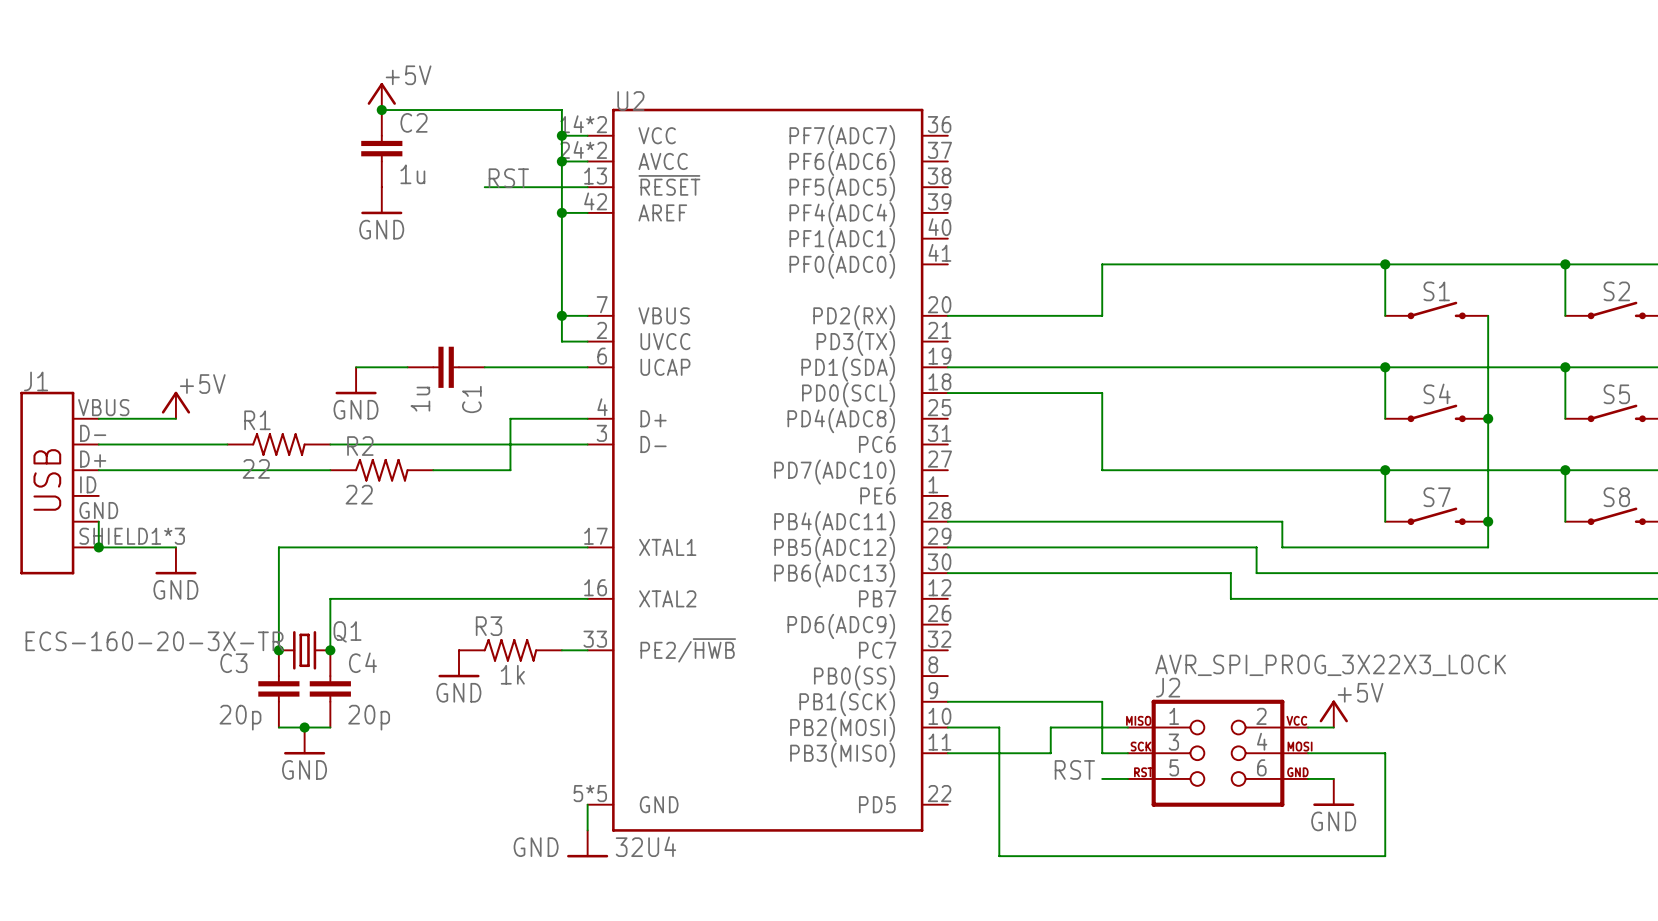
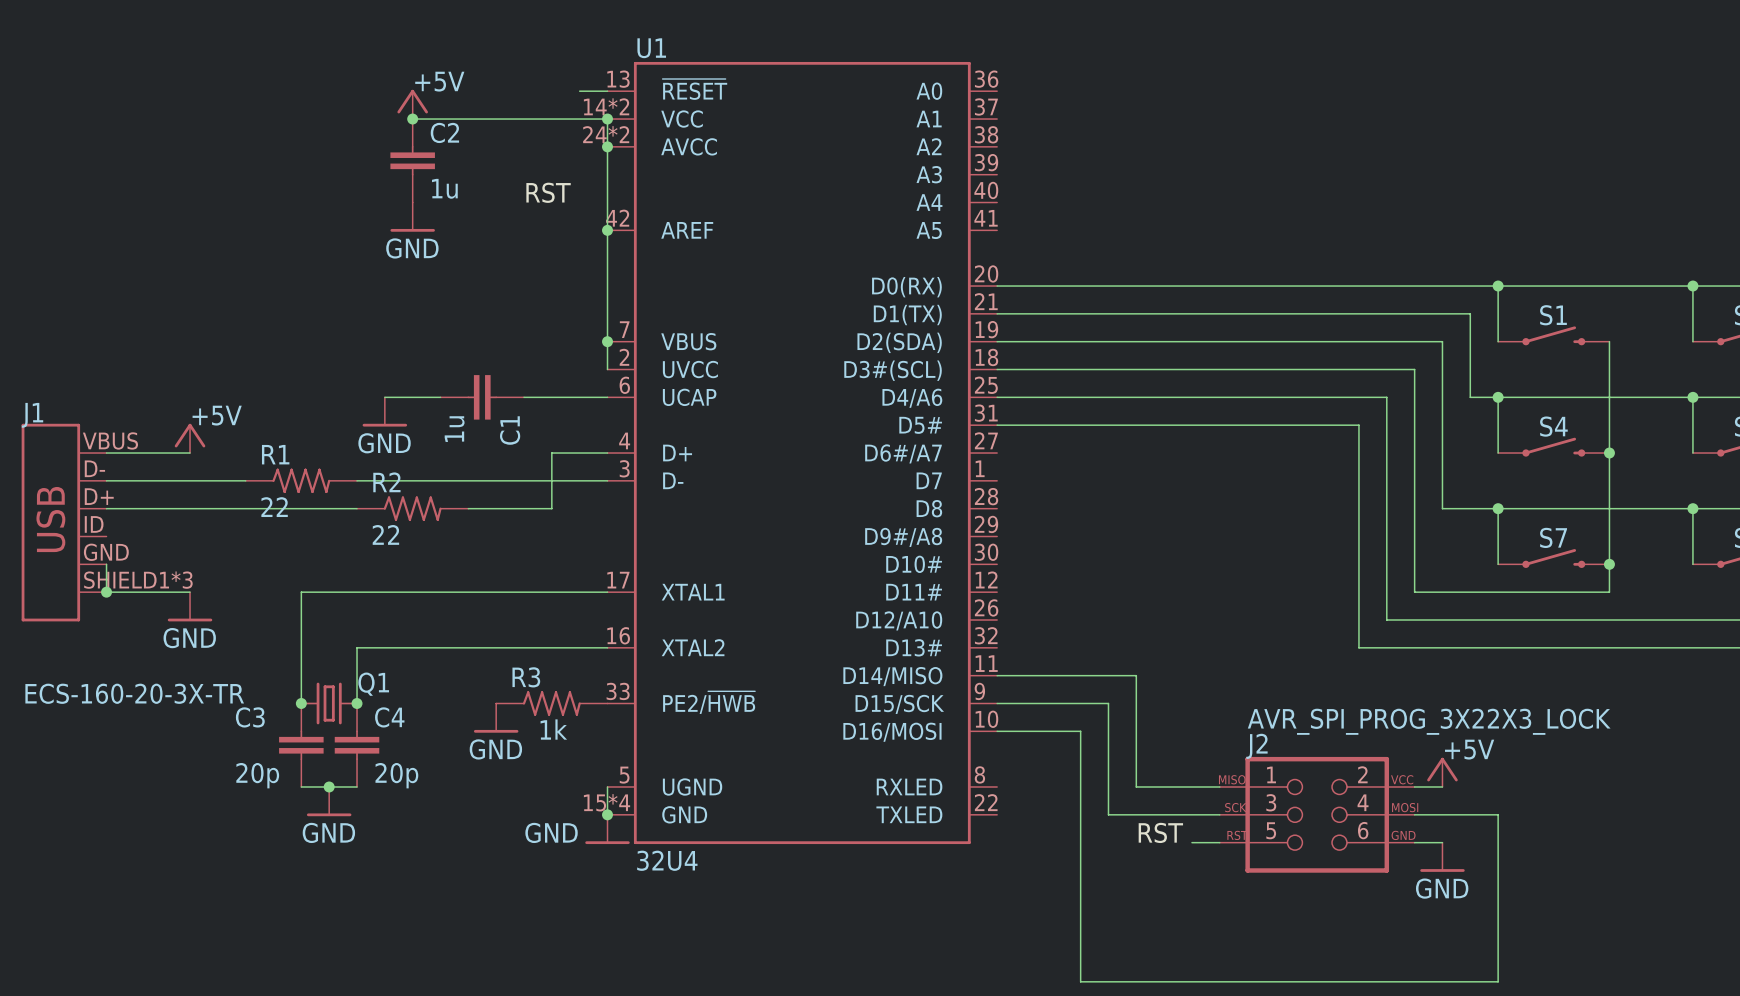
wire: (561, 161) (587, 161) -> (579, 91) (607, 91)
junction position: (561, 161) -> (607, 119)
wire: (484, 187) (587, 187) -> none
wire: (1102, 264) (1102, 315) -> (1191, 286) (997, 286)
wire: none -> (997, 313) (1470, 313) (1470, 397)
wire: (1282, 367) (1359, 367) -> (1386, 397) (1386, 564)
wire: (1102, 393) (1102, 470) (1333, 470) -> (1191, 341) (1442, 341) (1442, 508)
U1: none -> 32U4 (802, 453)
U2: 32U4 (767, 470) -> none
wire: (947, 521) (1282, 521) -> none
wire: (947, 547) (1256, 547) -> (1191, 425) (1358, 425) (1358, 592)
wire: (1282, 547) (1308, 547) -> (997, 369) (1414, 369) (1414, 592)
wire: (947, 573) (1230, 573) (1230, 598) (1256, 598) -> (1358, 620) (1358, 647)
wire: (1256, 573) (1282, 573) -> (1386, 592) (1386, 620)
wire: none -> (997, 675) (1136, 675) (1136, 786)
wire: (947, 701) (1102, 701) (1102, 753) -> none
wire: (947, 727) (999, 727) -> (997, 731) (1080, 731) (1080, 786)
wire: (1050, 727) (1050, 753) -> (1191, 814) (1136, 814)
junction: none -> (607, 814)
wire: (947, 753) (1025, 753) -> (997, 703) (1108, 703) (1108, 814)
wire: (587, 804) (587, 830) -> (607, 786) (607, 814)
power symbol position: GND (587, 843) -> GND (607, 829)
wire: (999, 856) (1385, 856) -> (1080, 926) (1080, 981) (1498, 981) (1498, 926)

